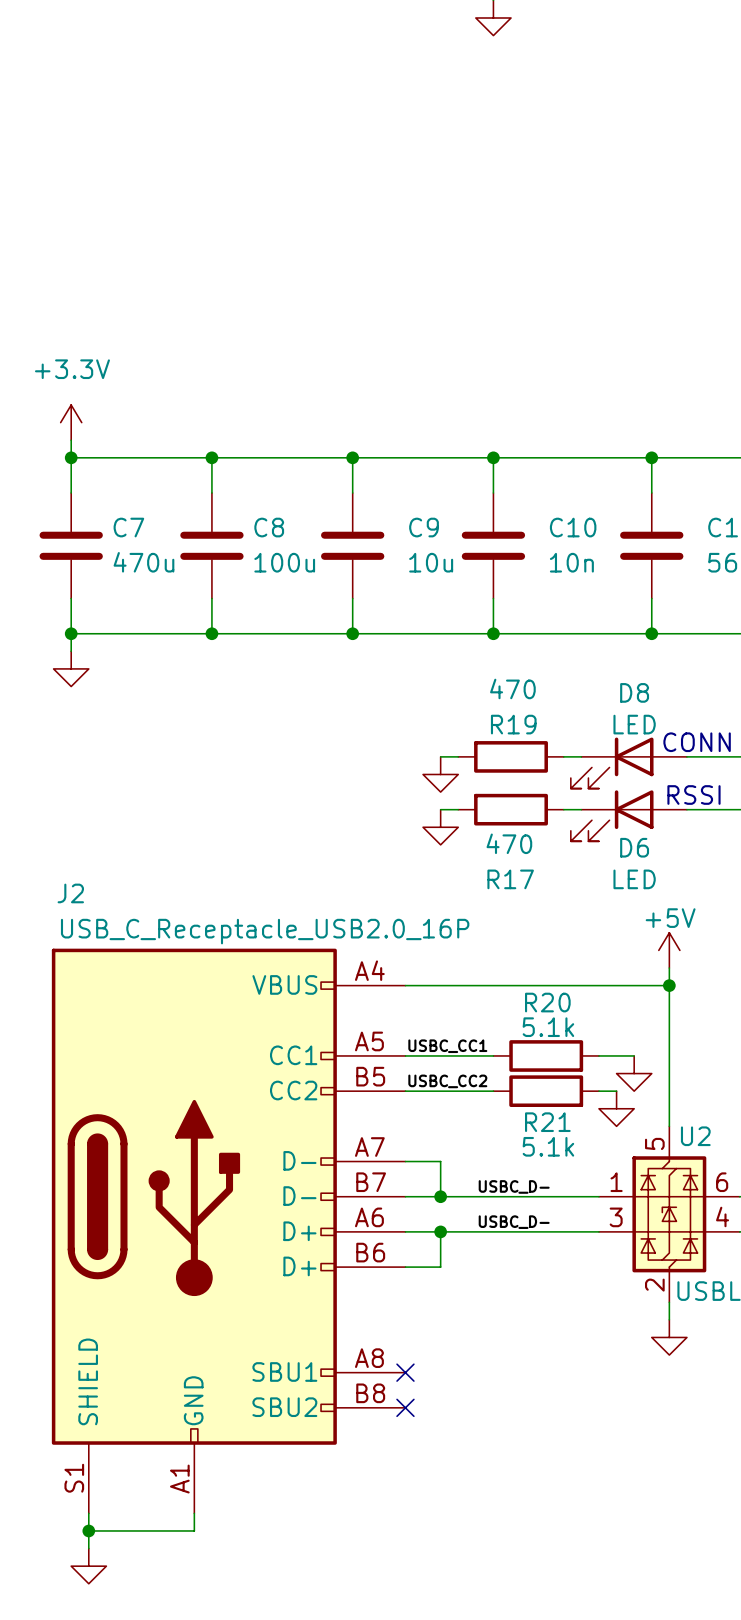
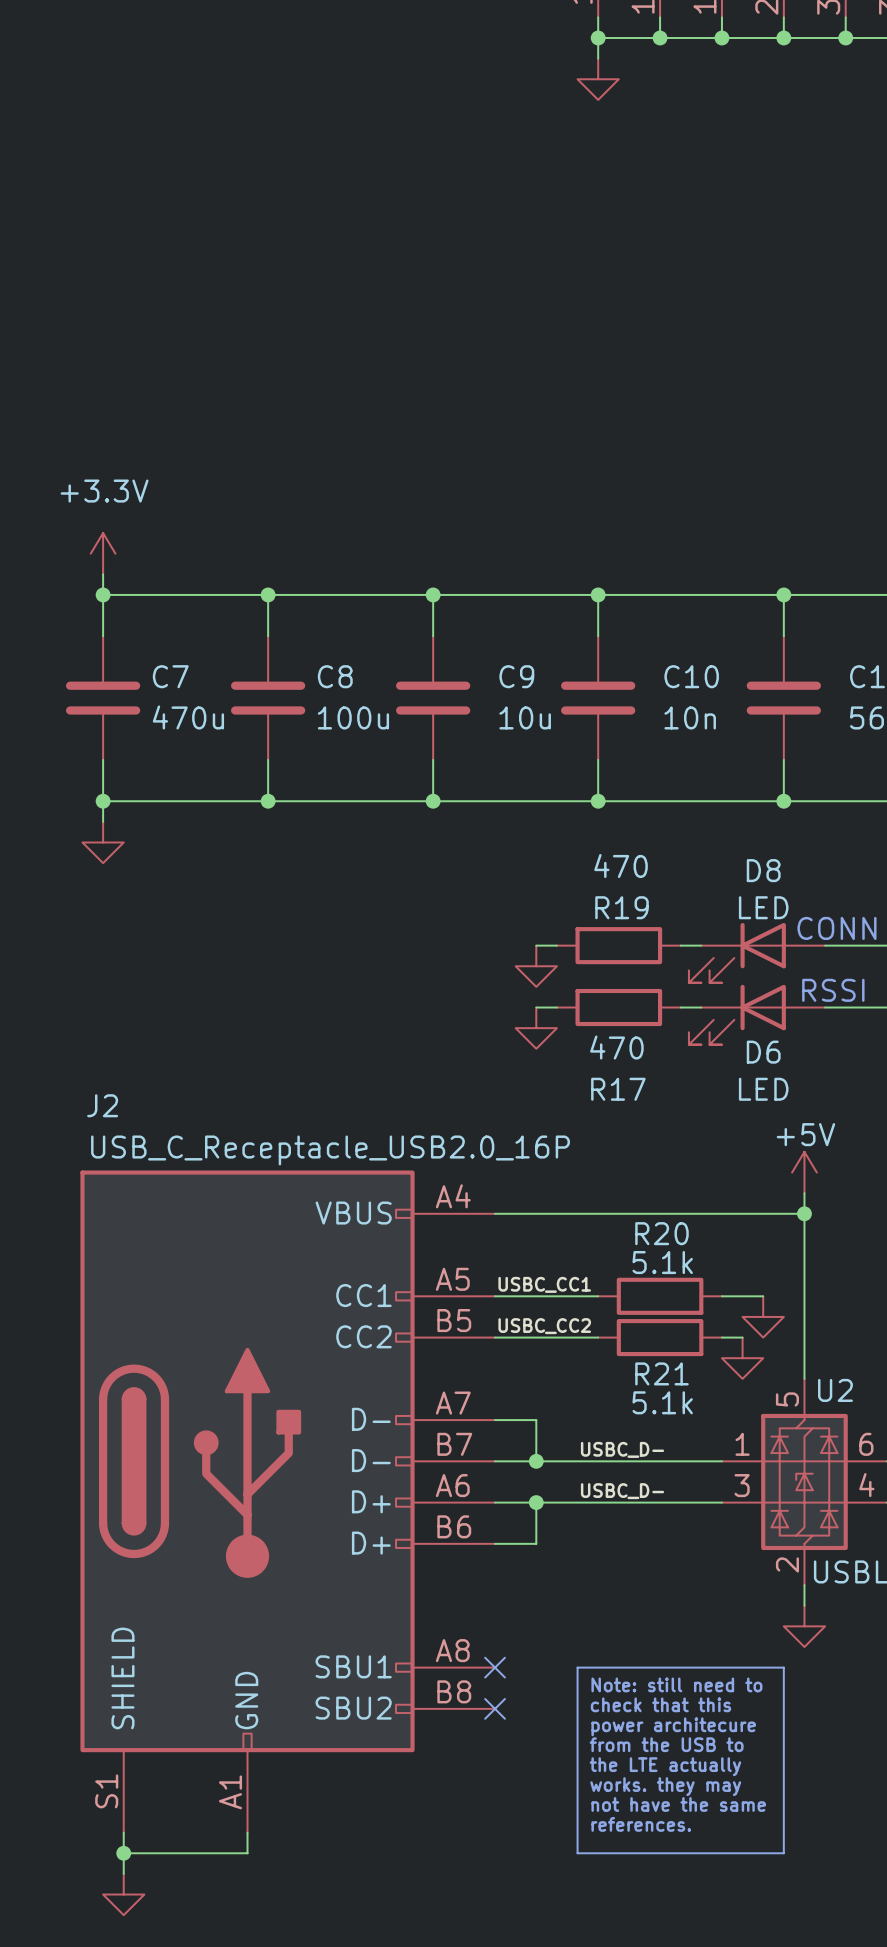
line: none -> (577, 1667) (783, 1667) (783, 1853) (577, 1853) (577, 1667)
text: none -> Note: still need to (676, 1684)
text: none -> check that this (661, 1704)
text: none -> power architecure (673, 1726)
text: none -> from the USB to (666, 1744)
text: none -> the LTE actually (665, 1766)
text: none -> works. they may (665, 1786)
text: none -> not have the same (678, 1804)
text: none -> references. (641, 1824)

